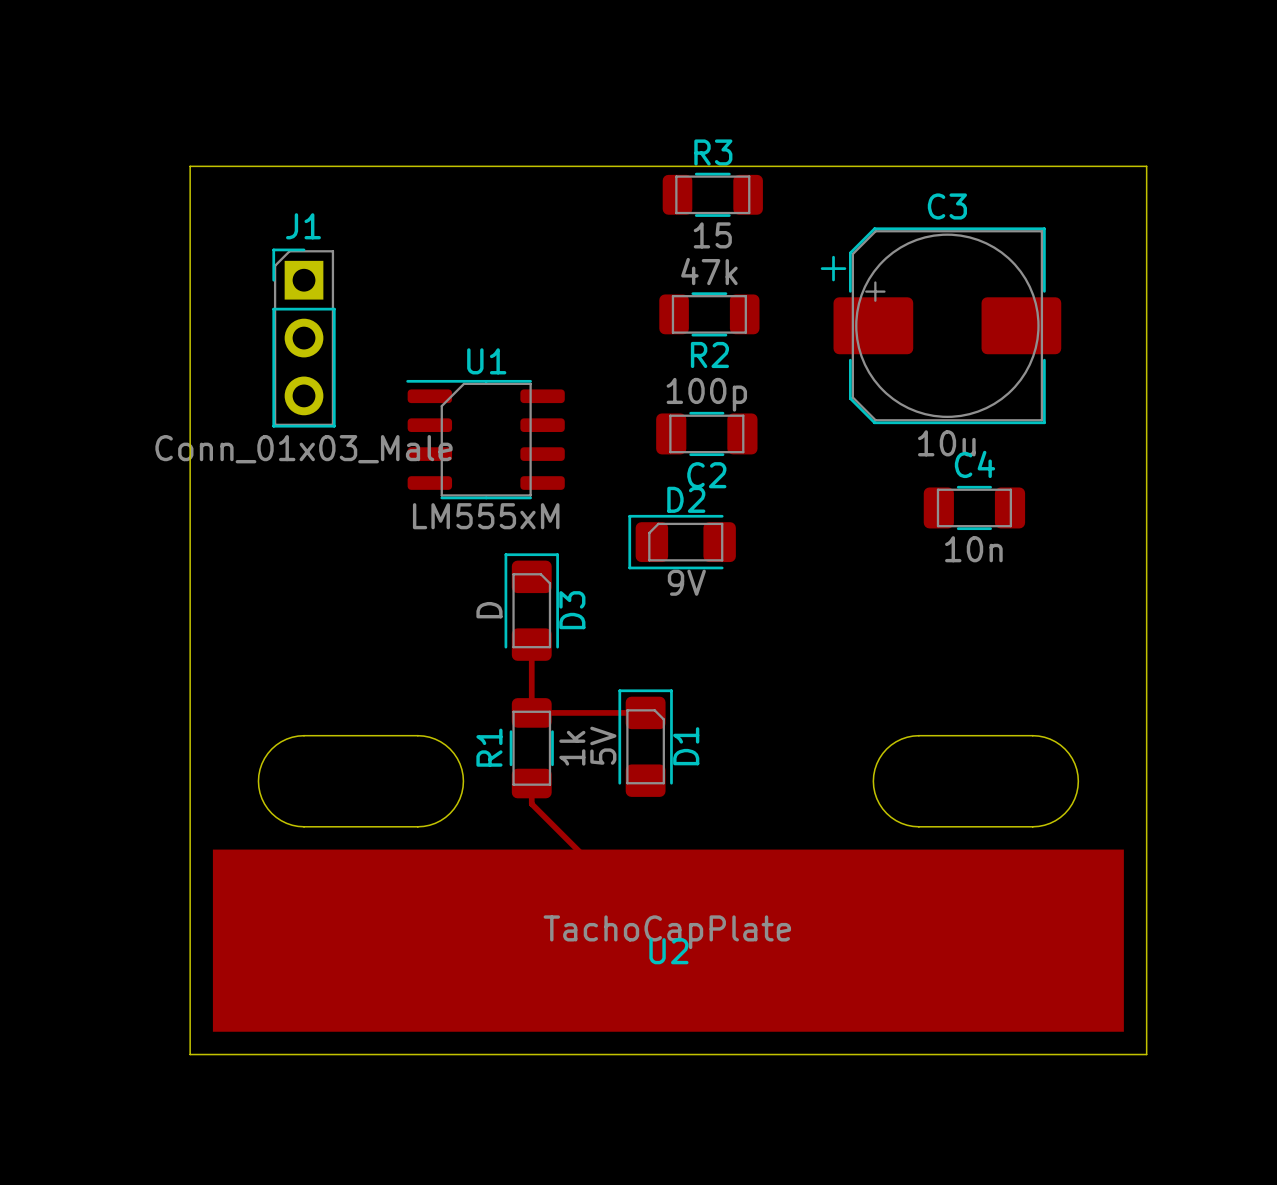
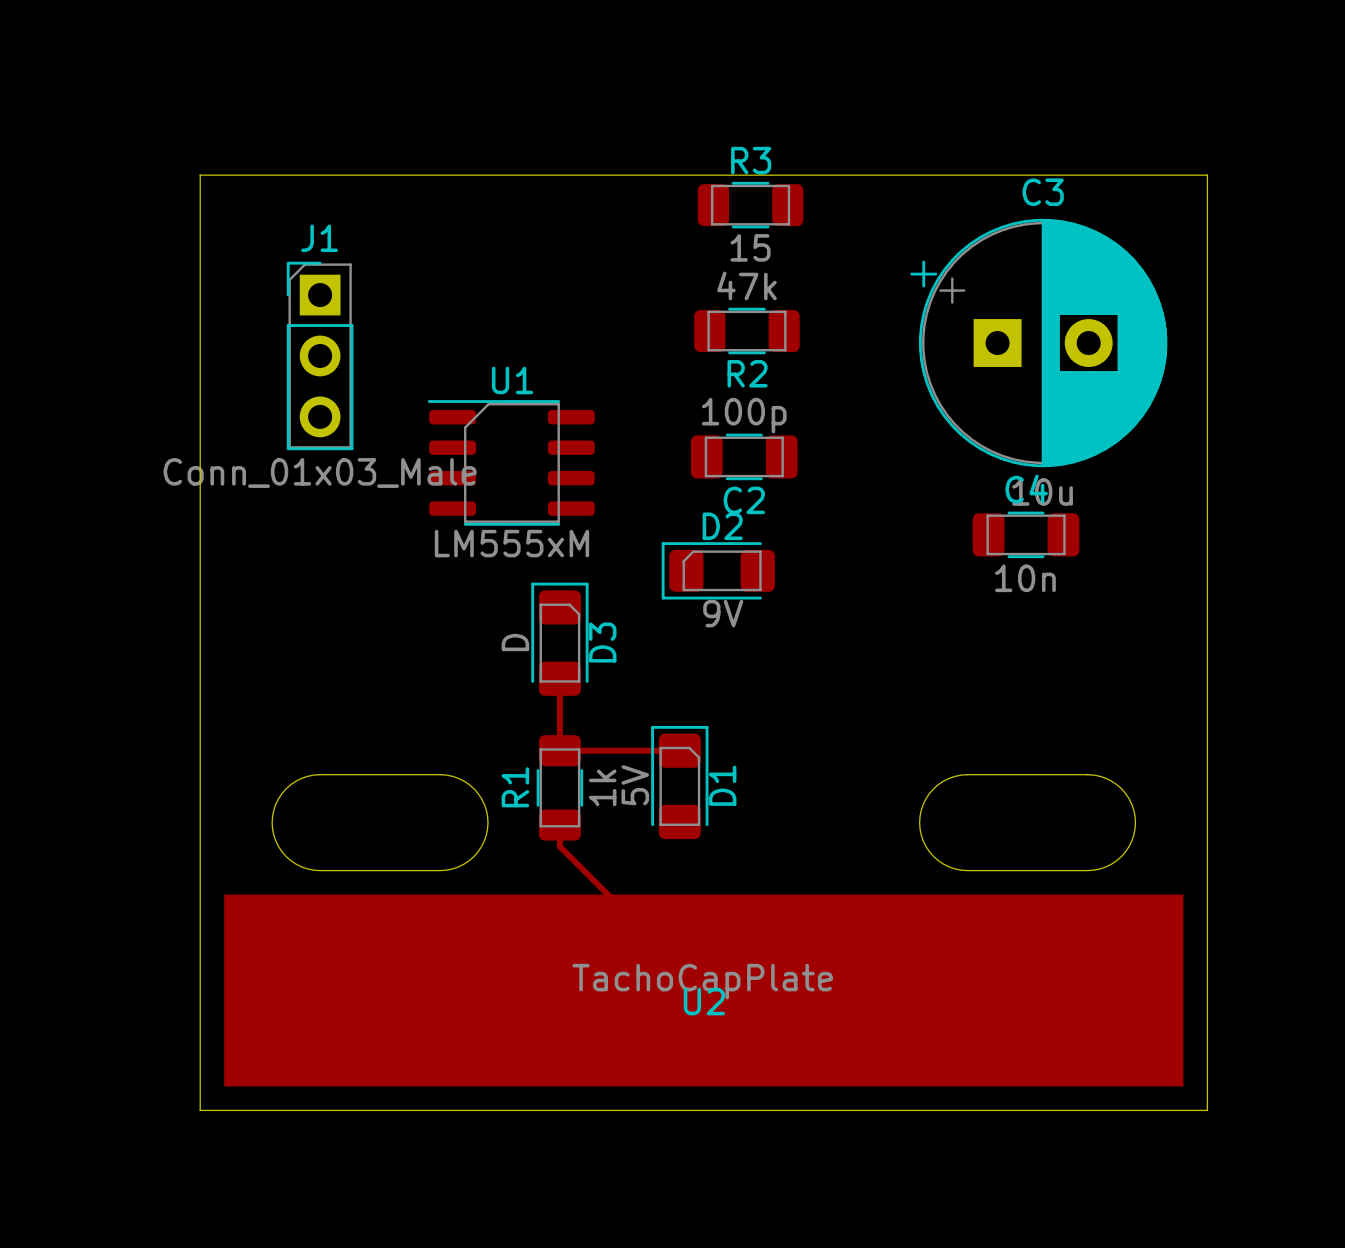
C3 footprint: [820, 227, 1062, 425] -> [910, 218, 1168, 468]

